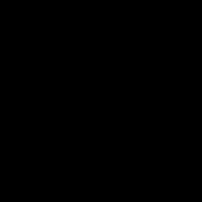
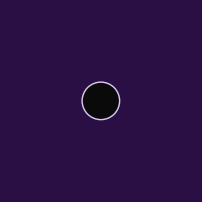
part: none -> (100, 100)

